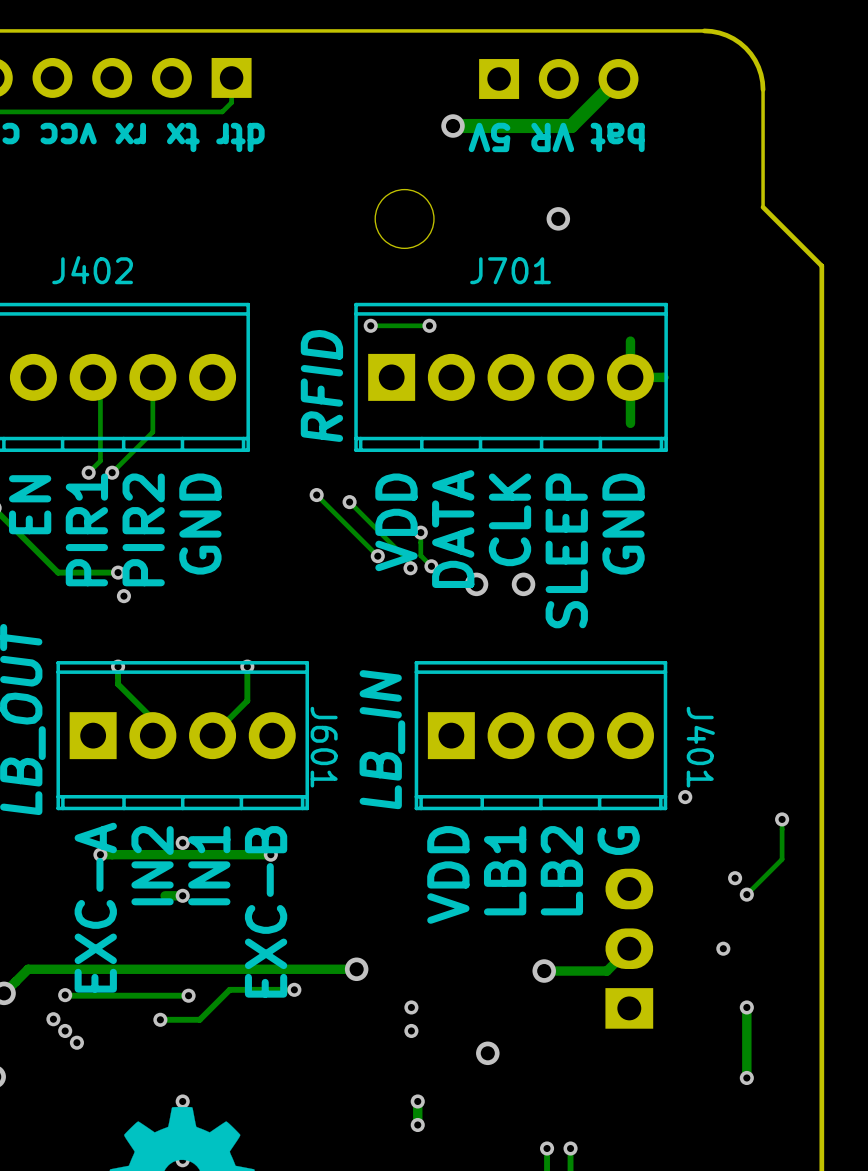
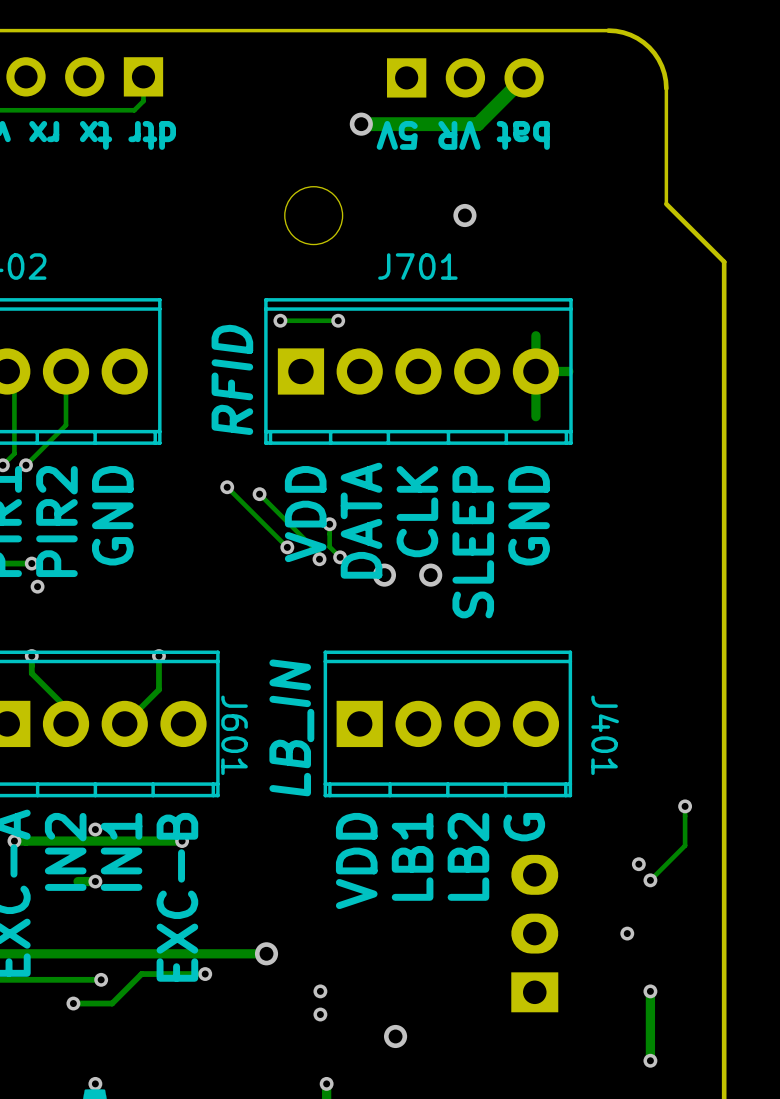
via: (685, 797) -> none
track: (629, 948) (606, 971) (544, 971) -> none
via: (544, 971) -> none

